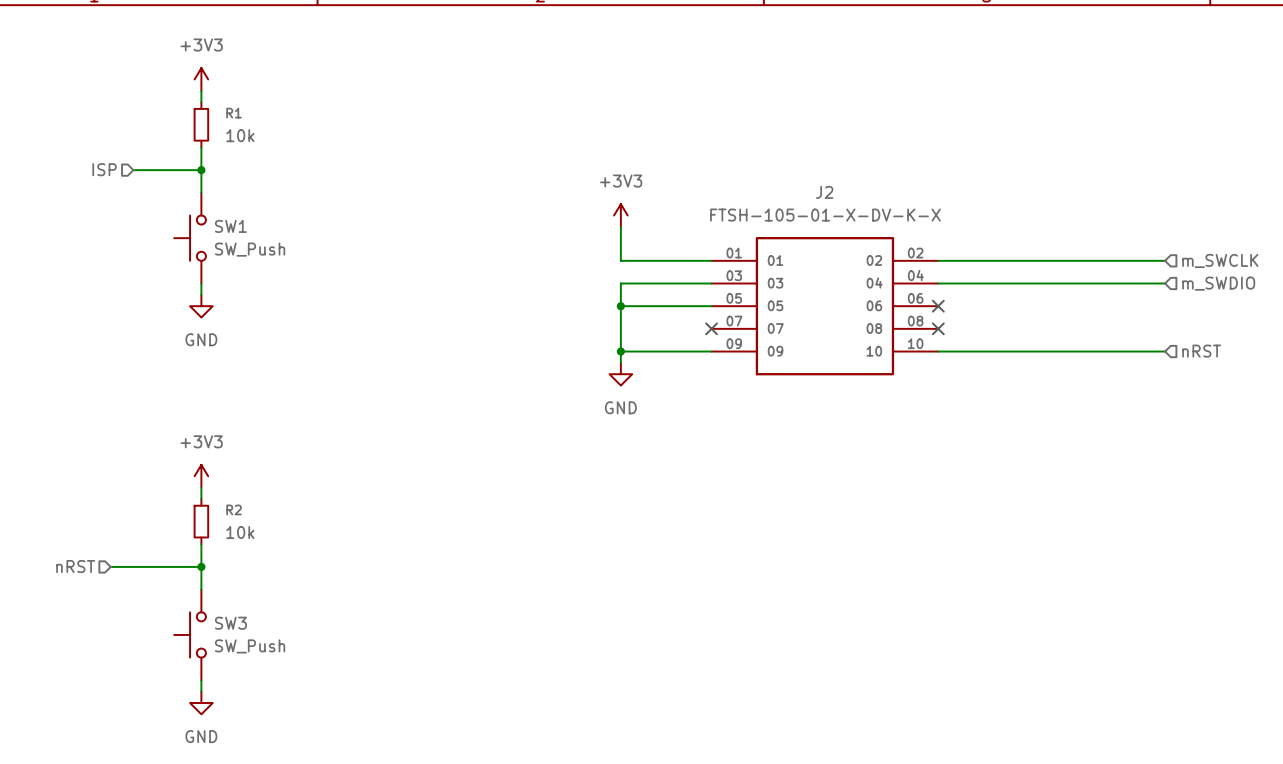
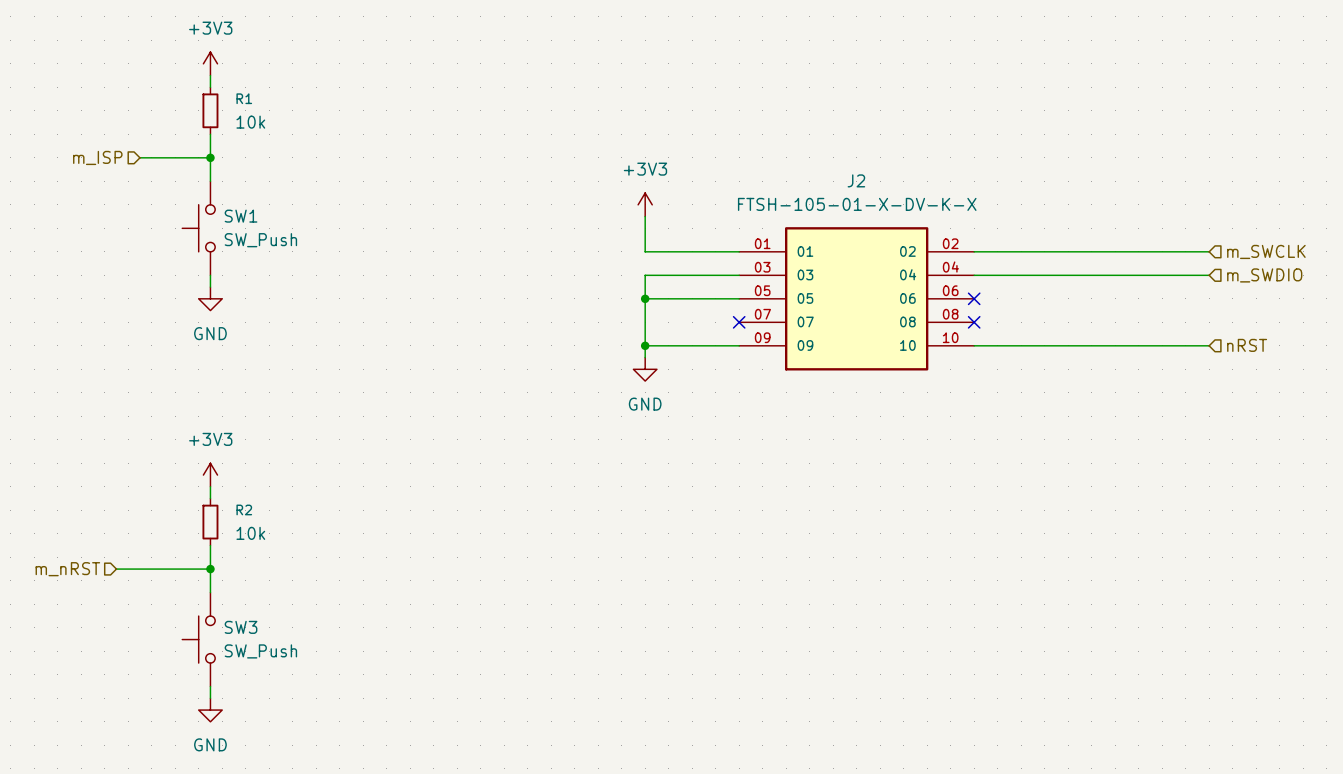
hierarchical label: ISP (104, 169) -> m_ISP (97, 157)
hierarchical label: nRST (75, 566) -> m_nRST (67, 569)

